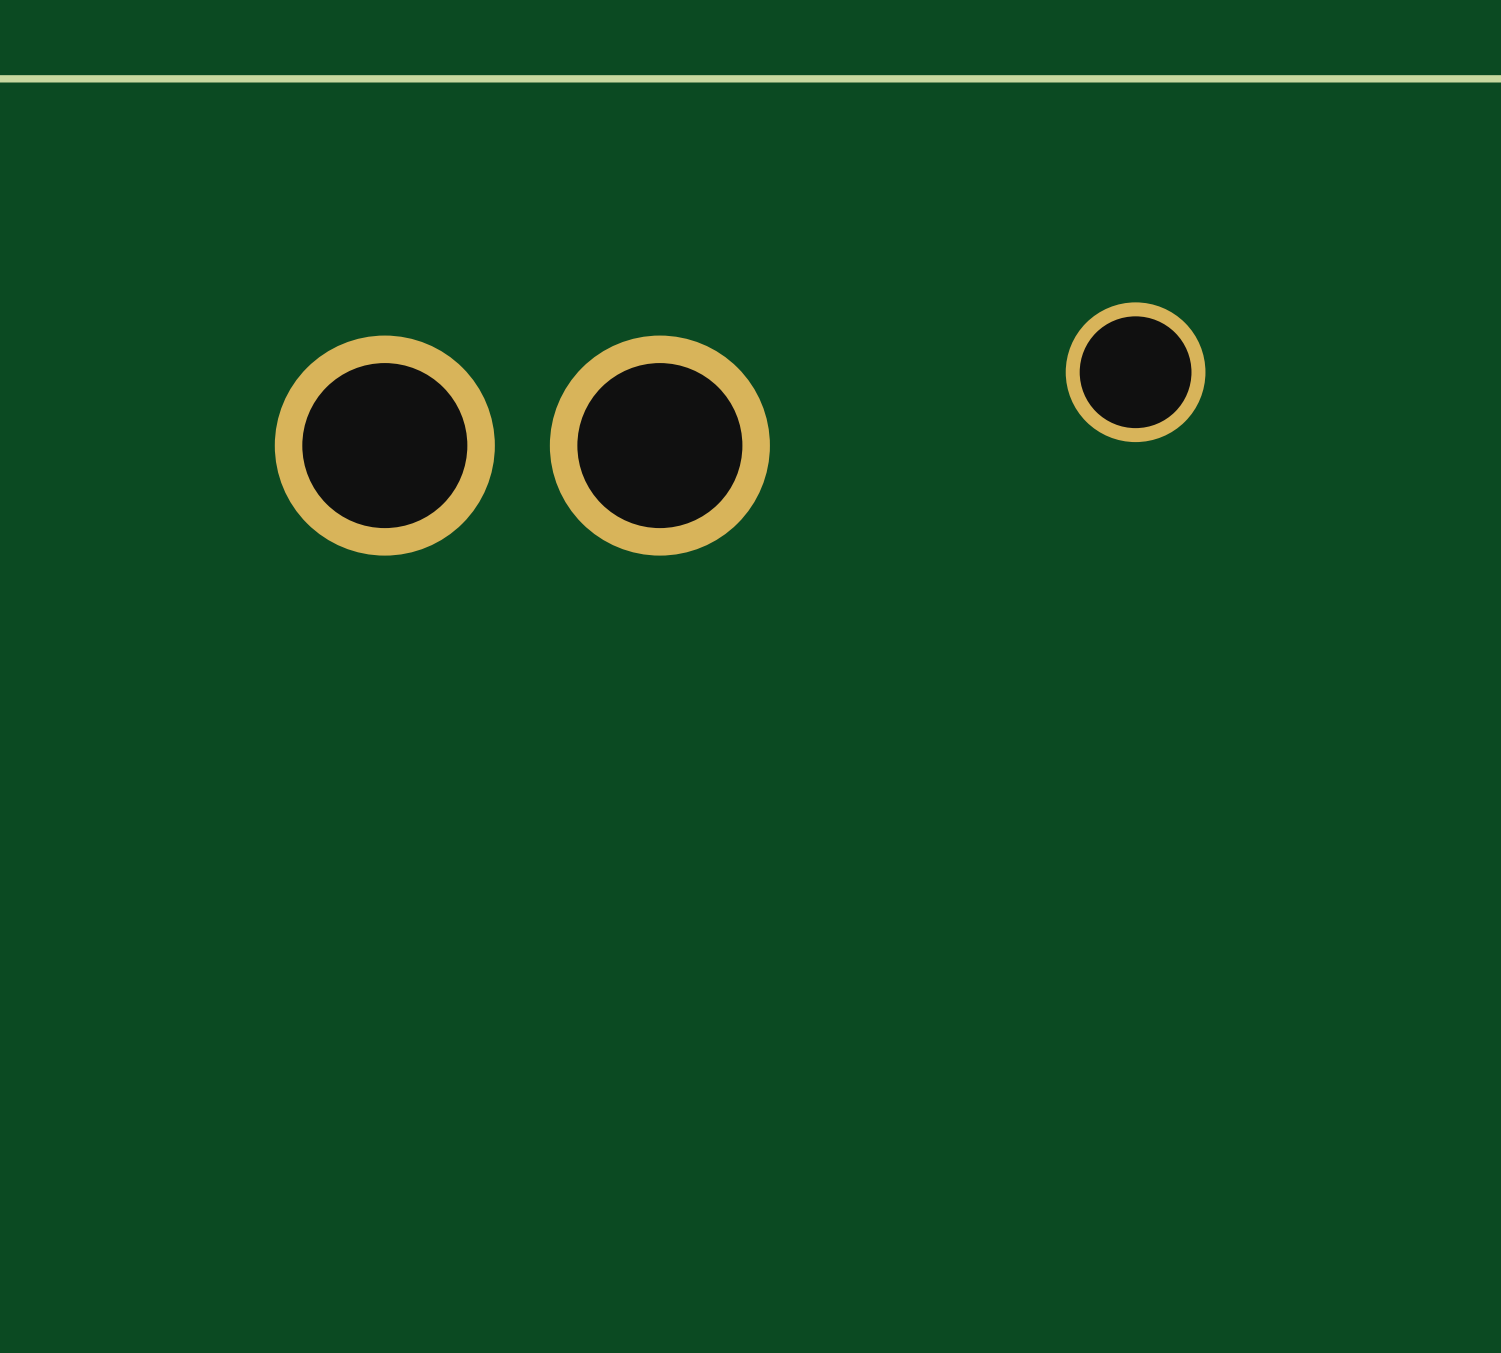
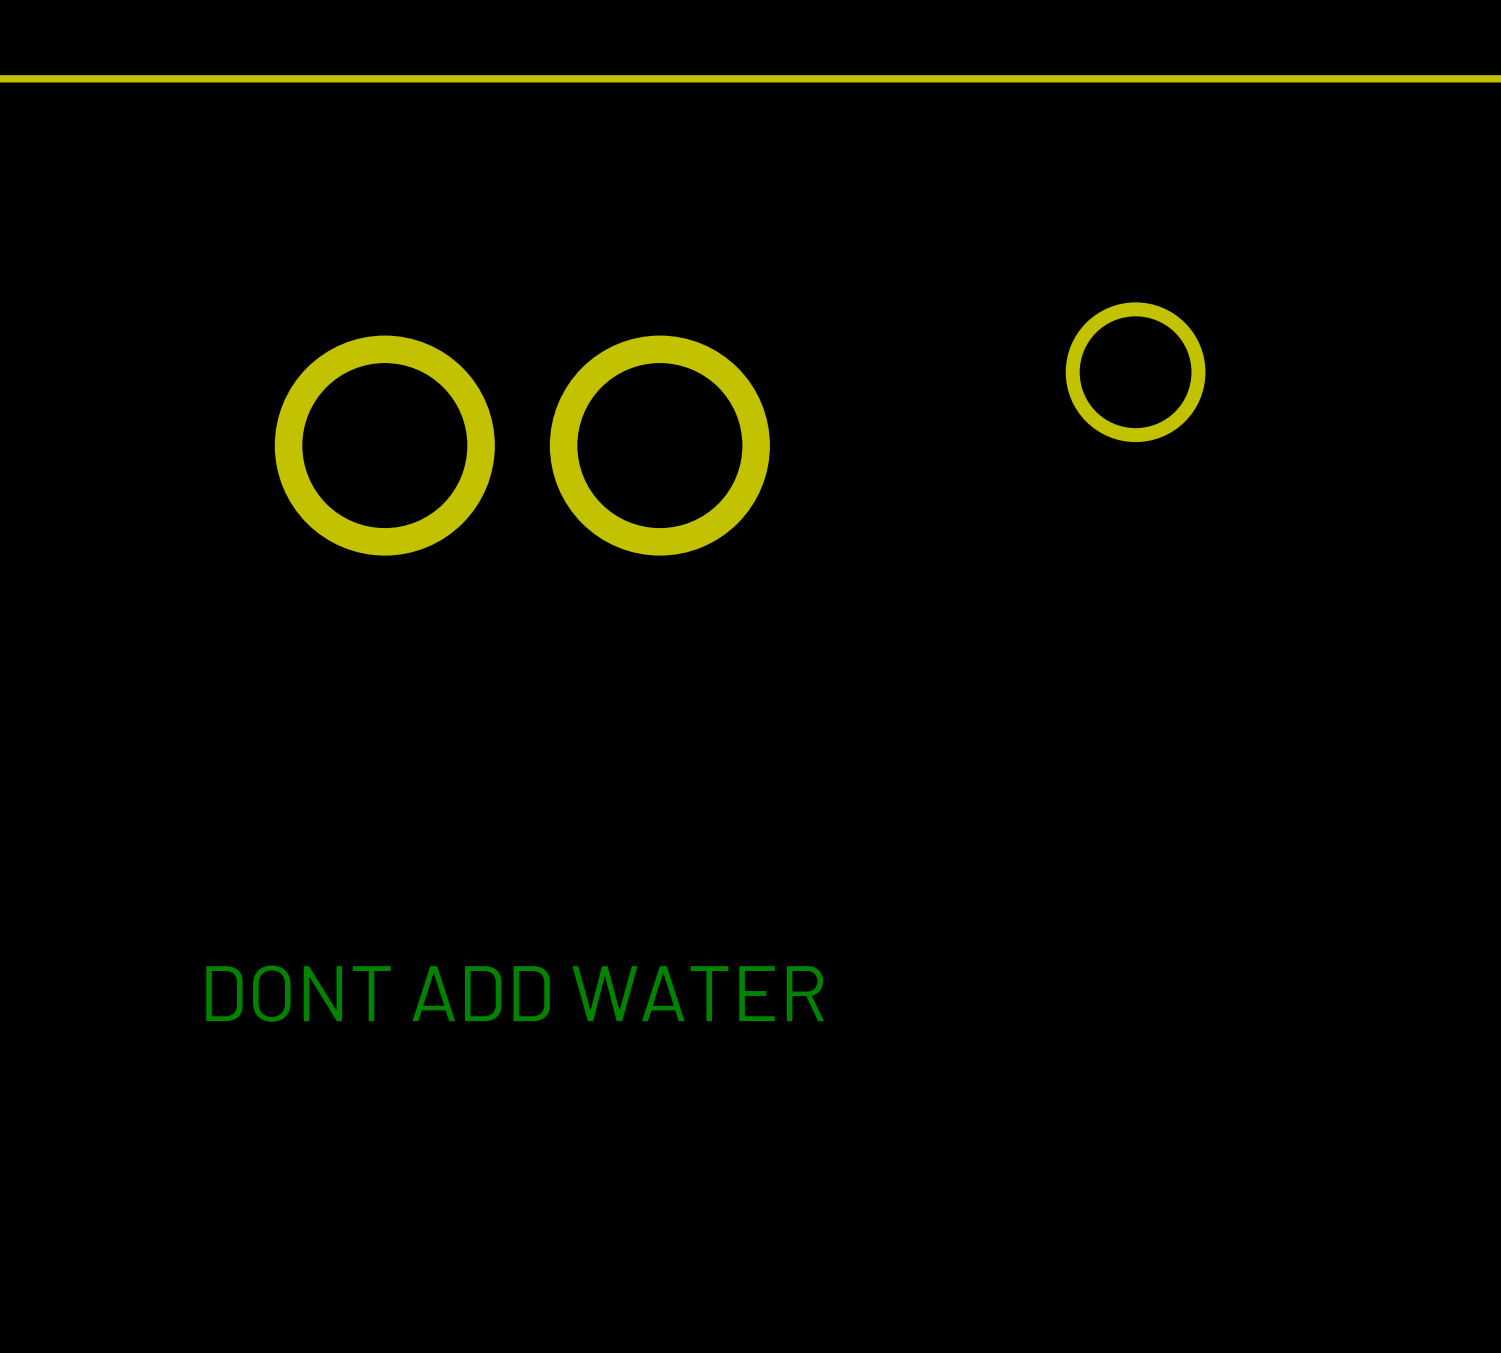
text: none -> DONT ADD WATER (514, 993)

